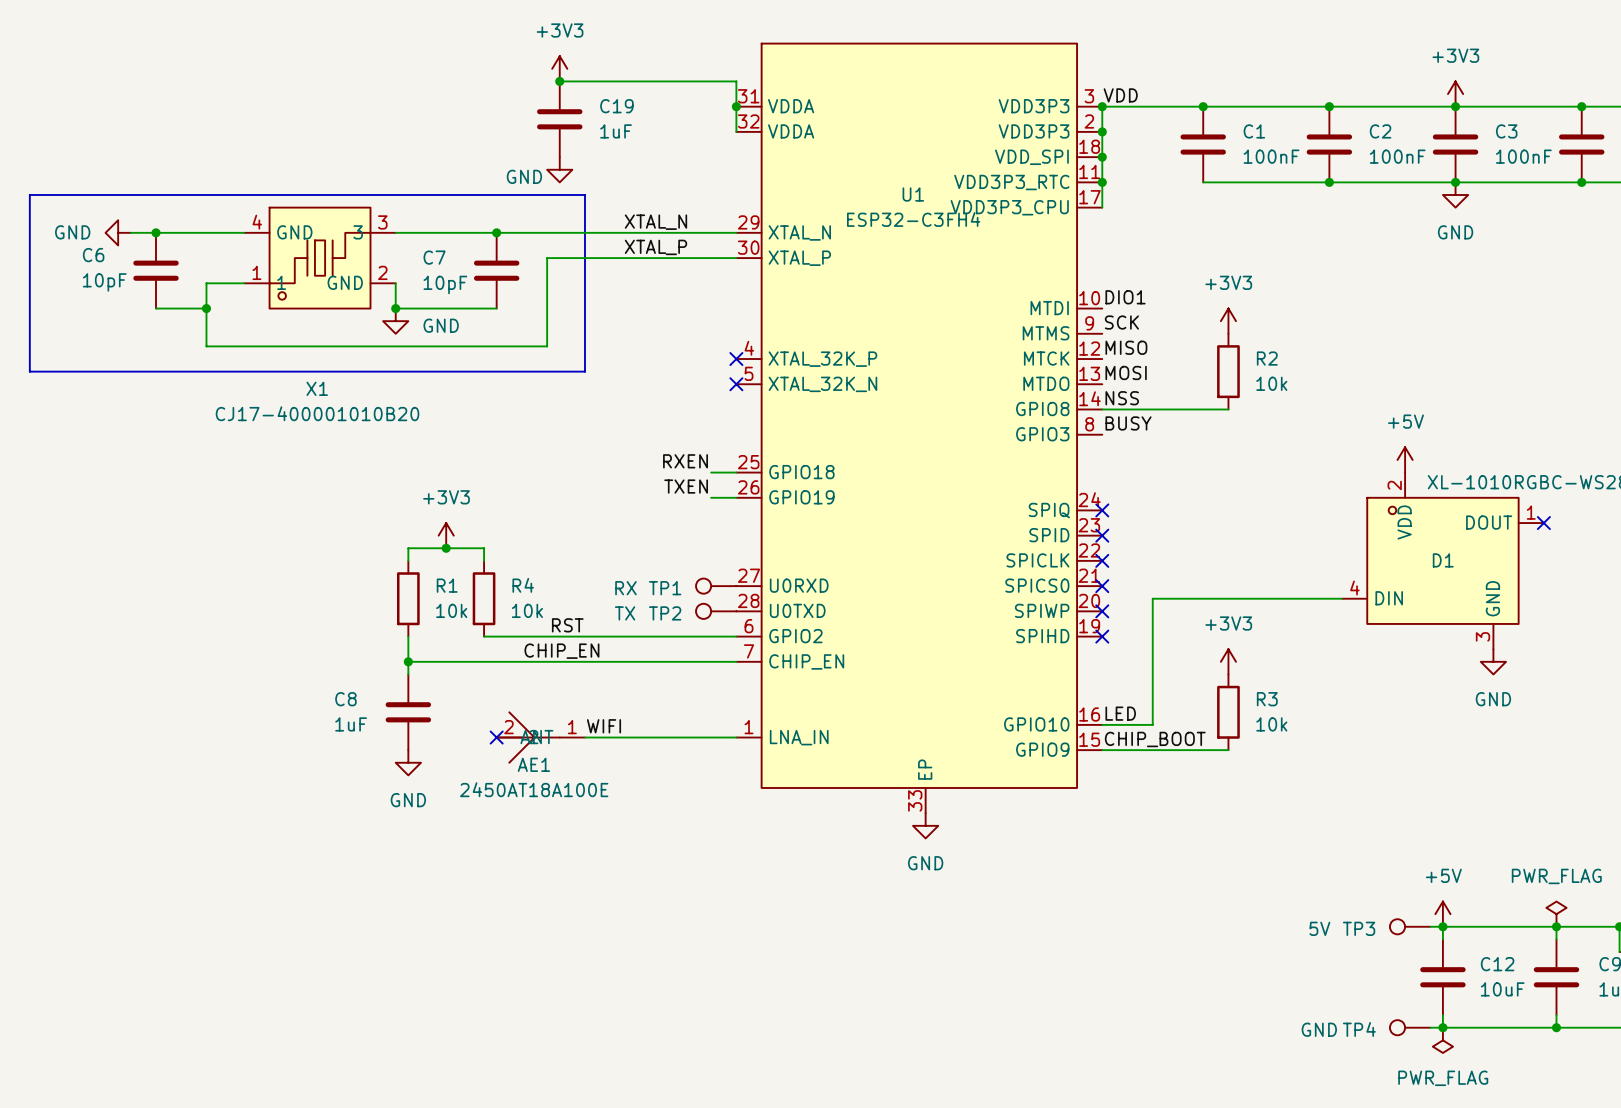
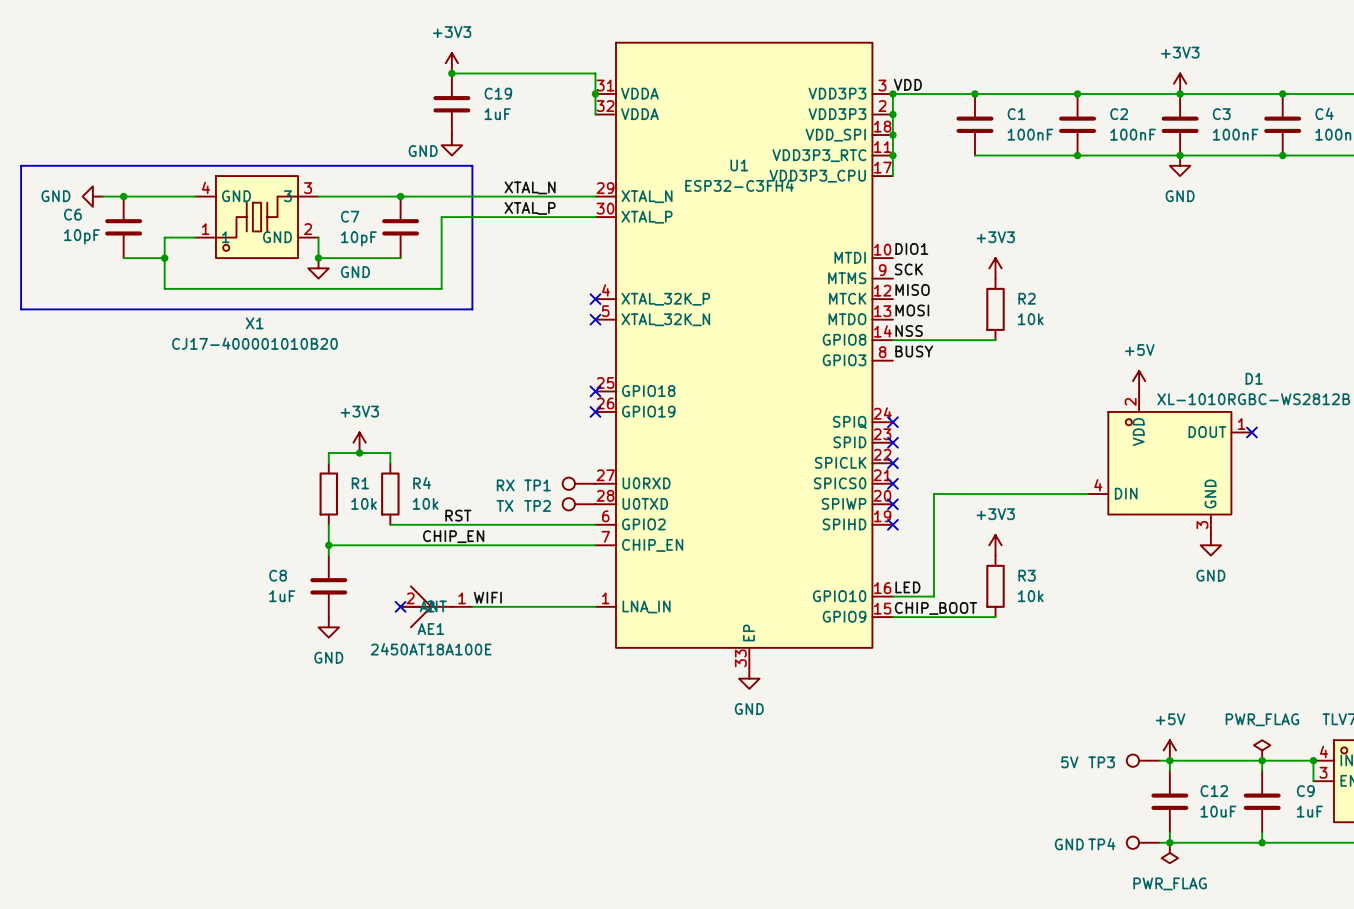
label: RXEN (685, 461) -> none
wire: (711, 472) (736, 472) -> none
no-connect mark: none -> (595, 391)
label: TXEN (686, 486) -> none
wire: (711, 497) (736, 497) -> none
no-connect mark: none -> (595, 411)
D1 name position: D1 (1443, 560) -> D1 (1254, 378)

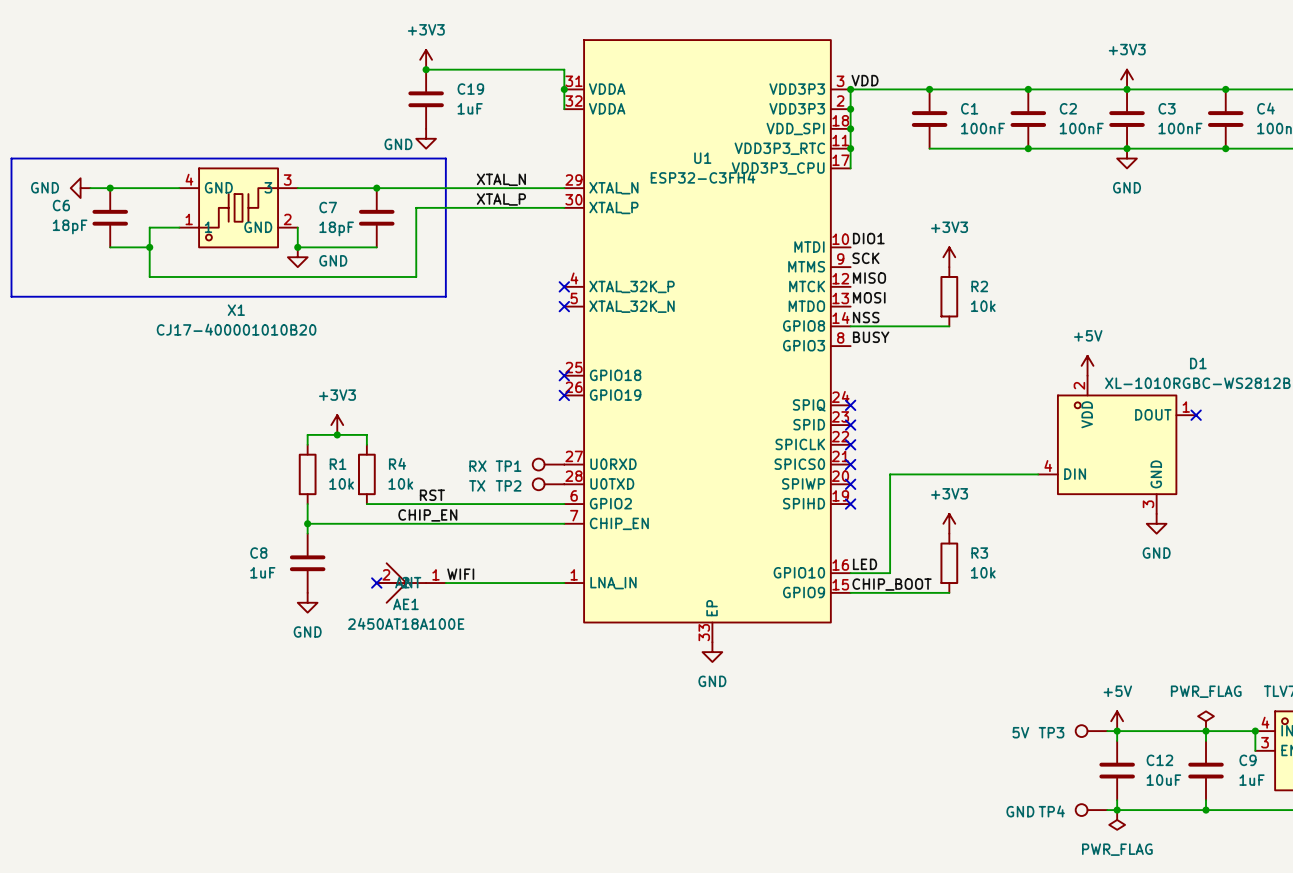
C6 value: 10pF (81, 236) -> 18pF (70, 226)
C7 value: 10pF (358, 238) -> 18pF (336, 228)

